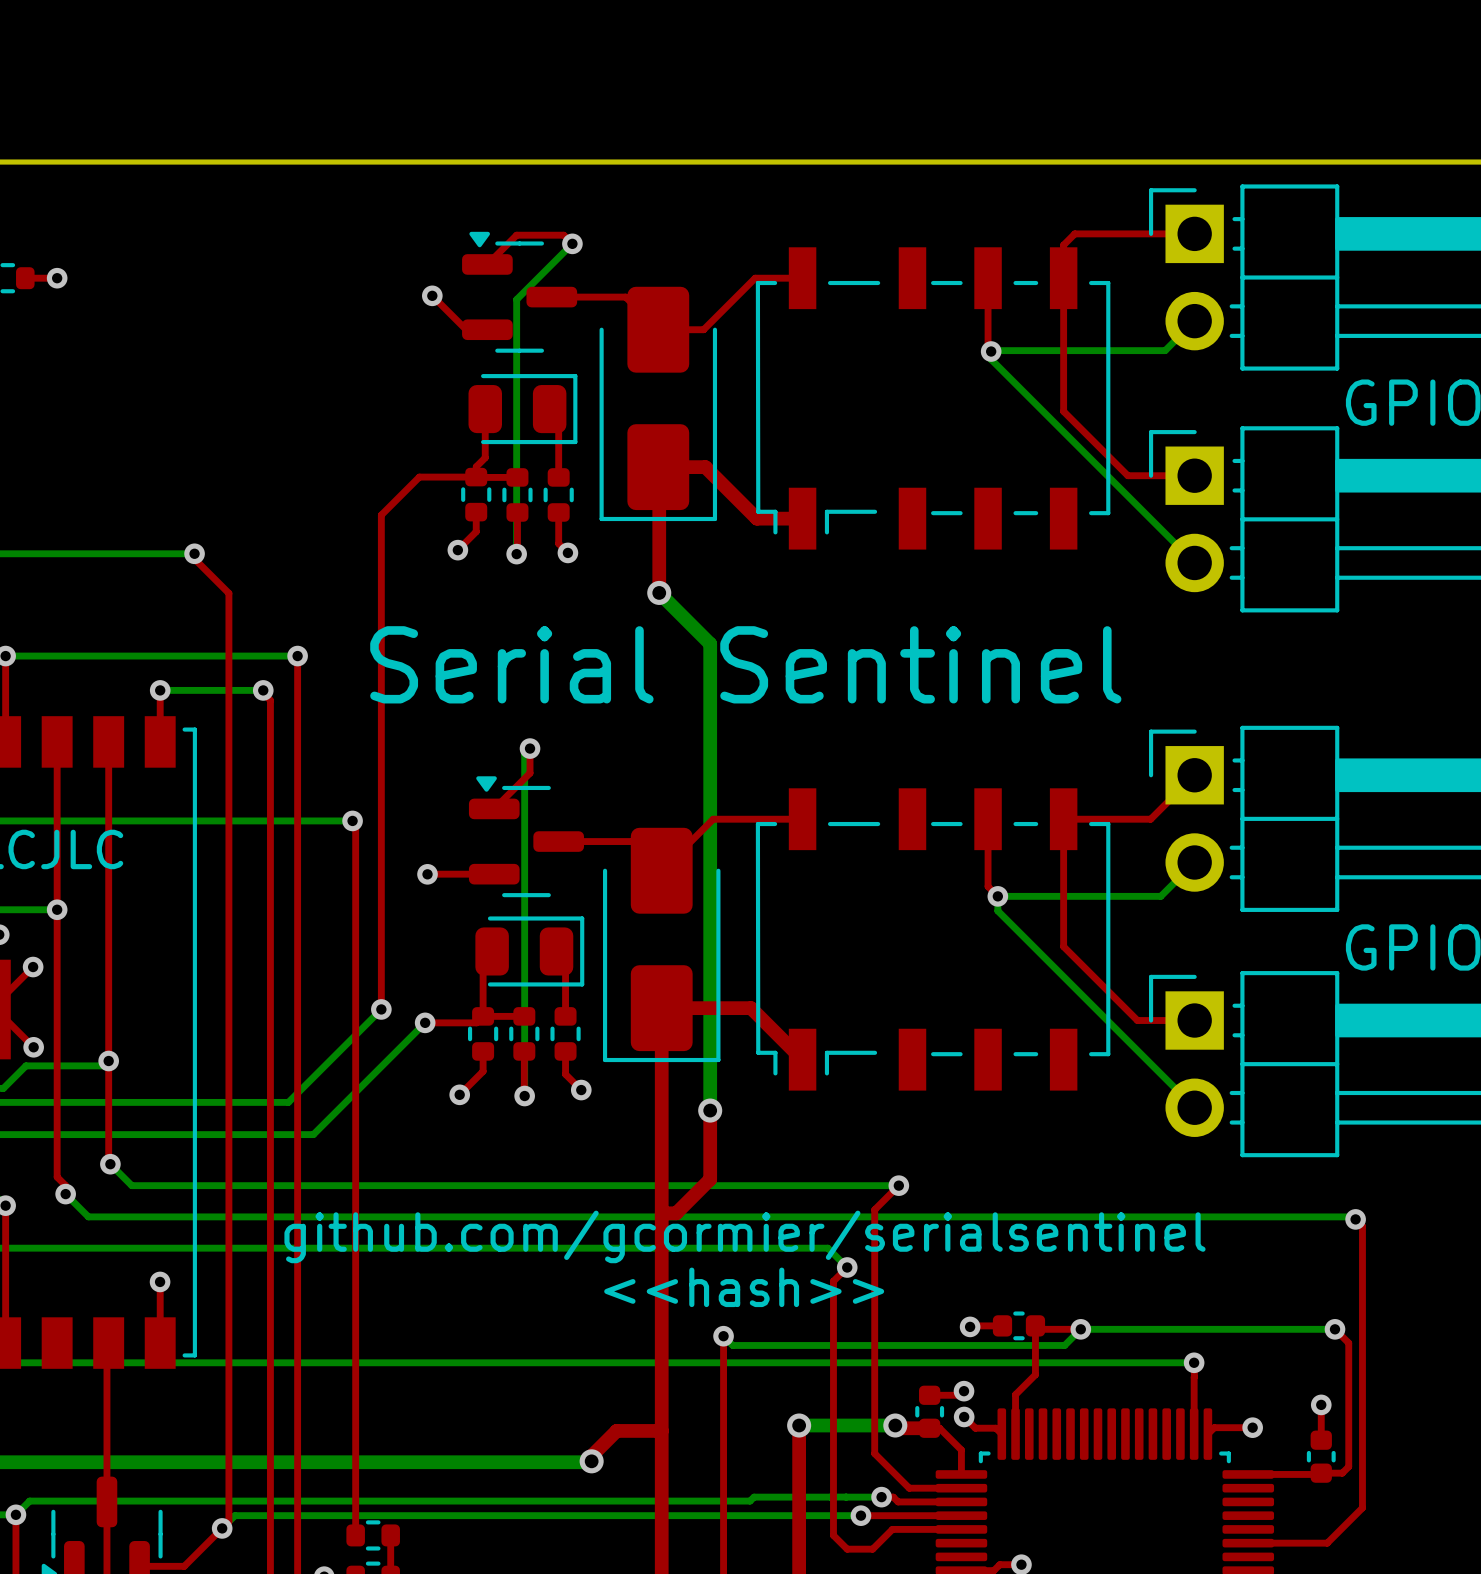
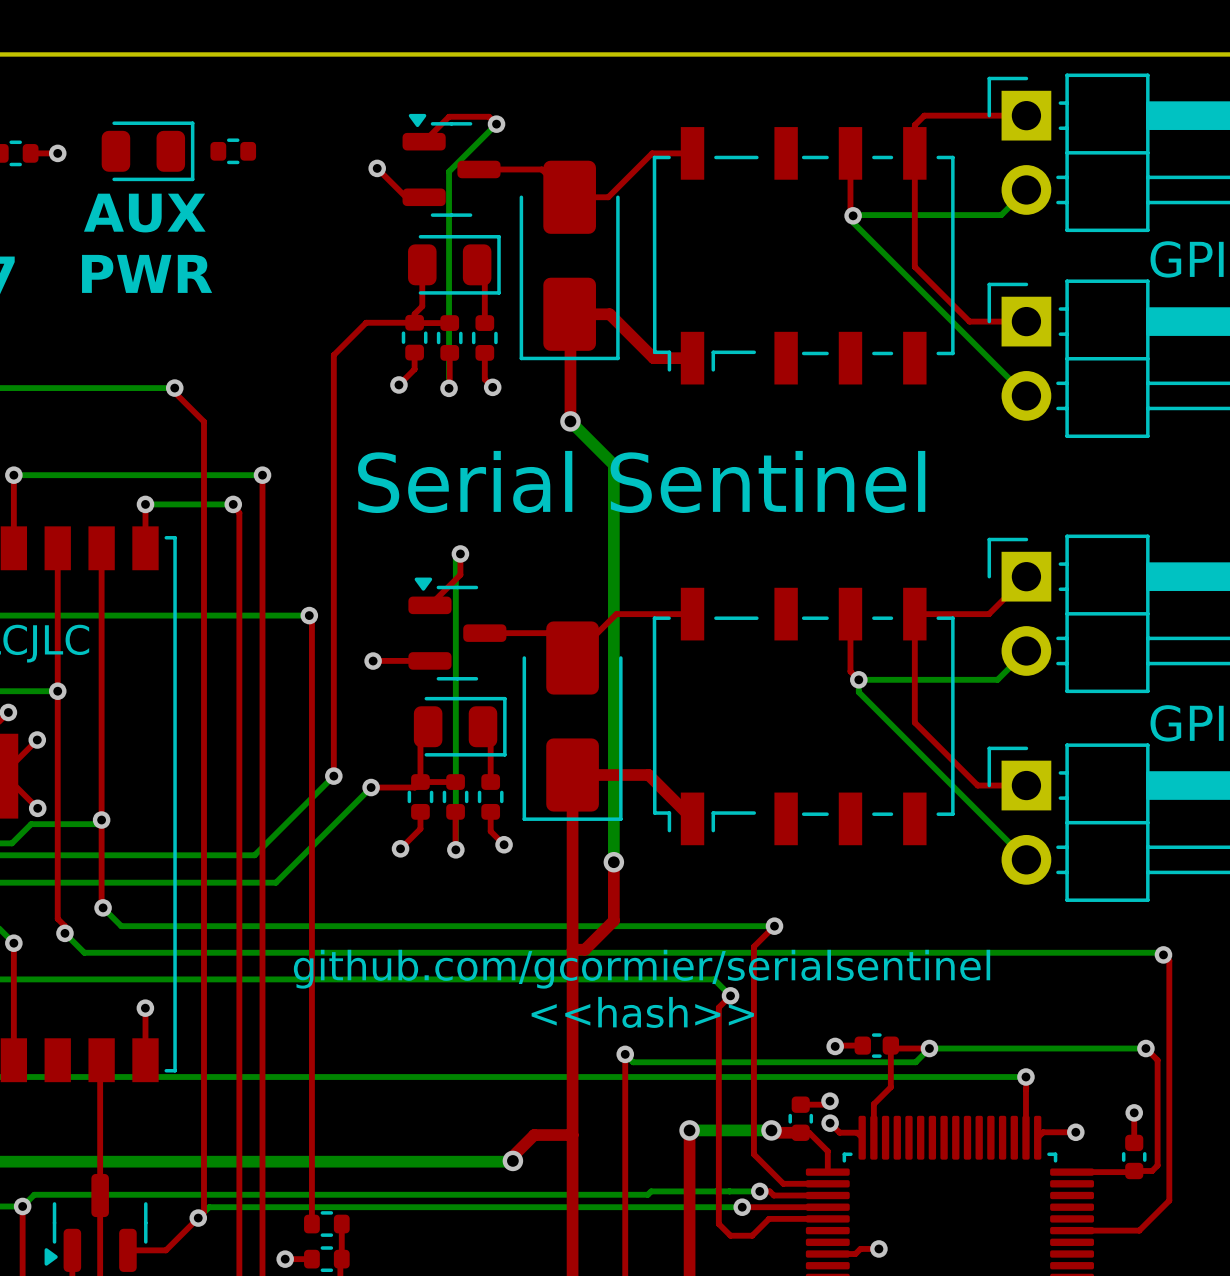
part: none -> (148, 151)
part: none -> (233, 151)
text: none -> AUX (144, 213)
text: none -> PWR (147, 273)

